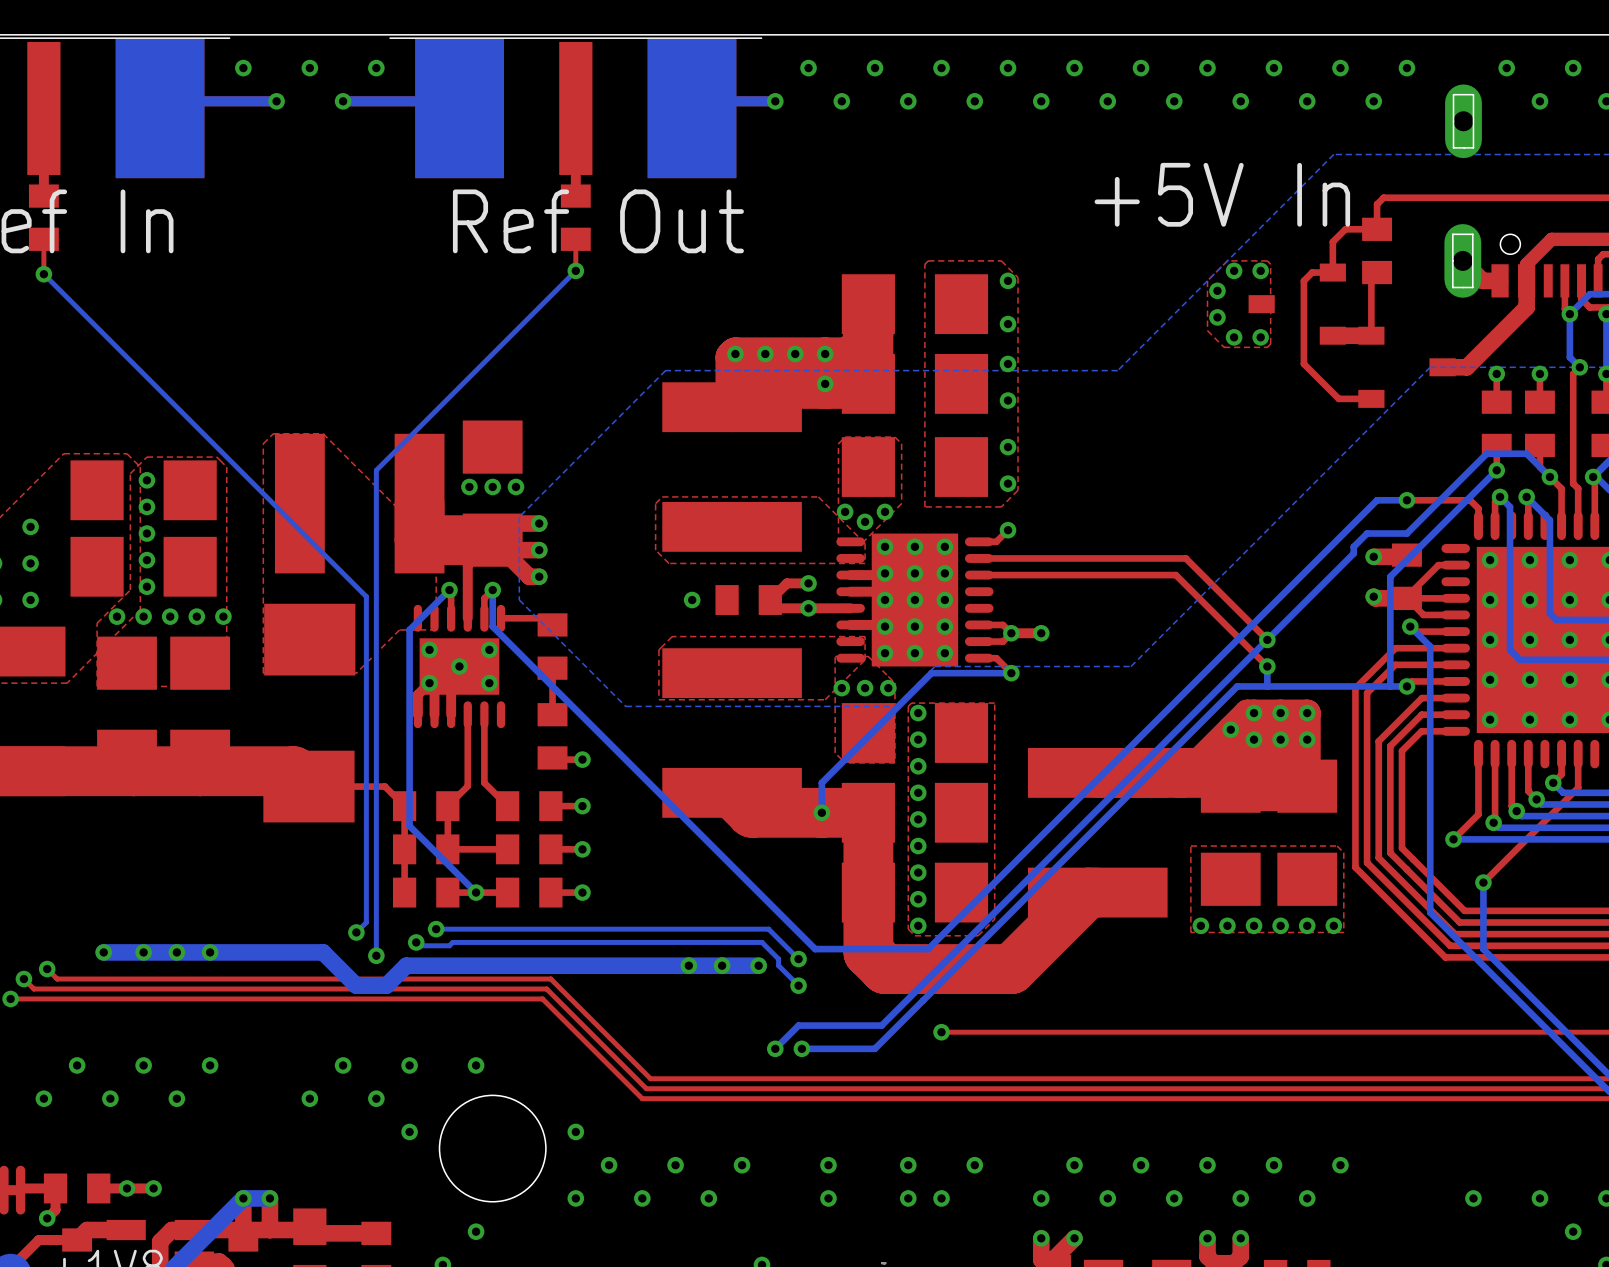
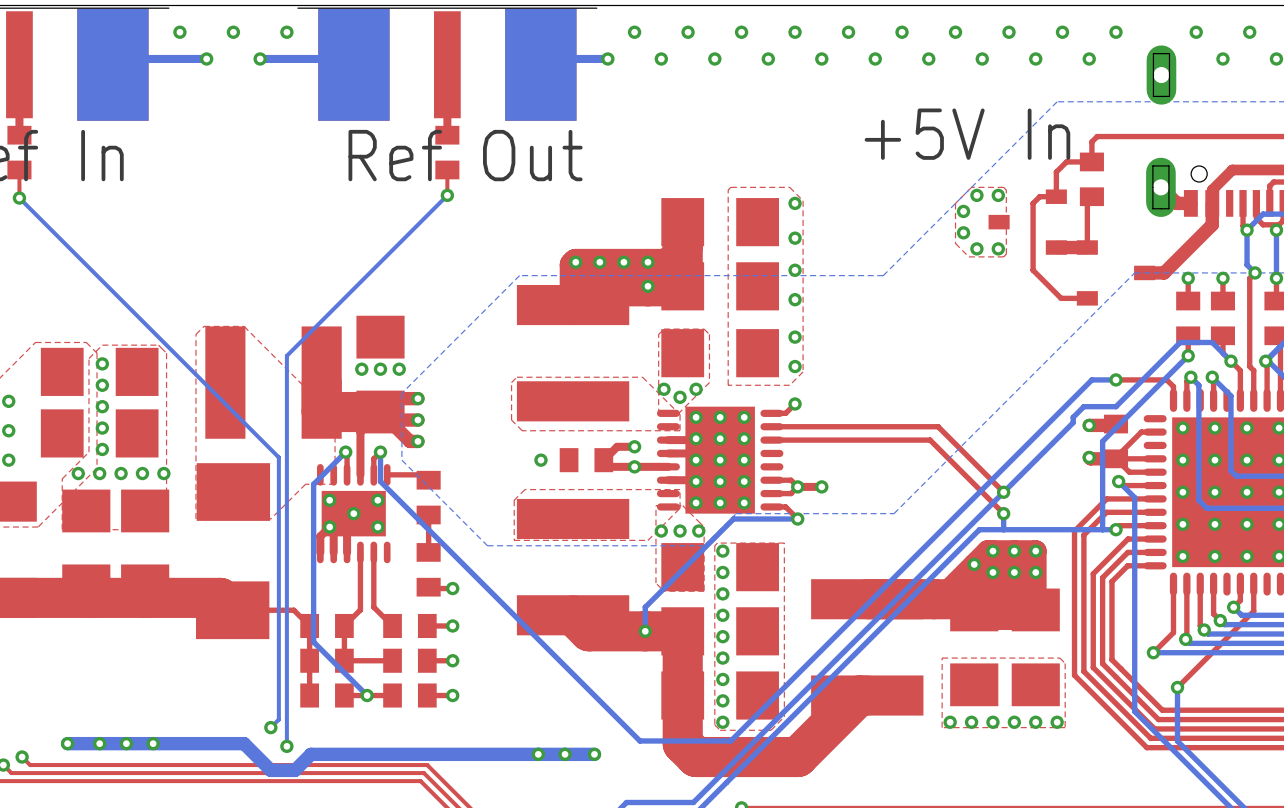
bottom track: (436, 929) (768, 929) (798, 959) -> none
via: (436, 929) -> none
bottom track: (416, 942) (419, 945) (449, 945) (452, 942) (762, 942) (778, 959) (778, 965) (798, 985) -> none
via: (416, 942) -> none
via: (798, 959) -> none
via: (798, 985) -> none

